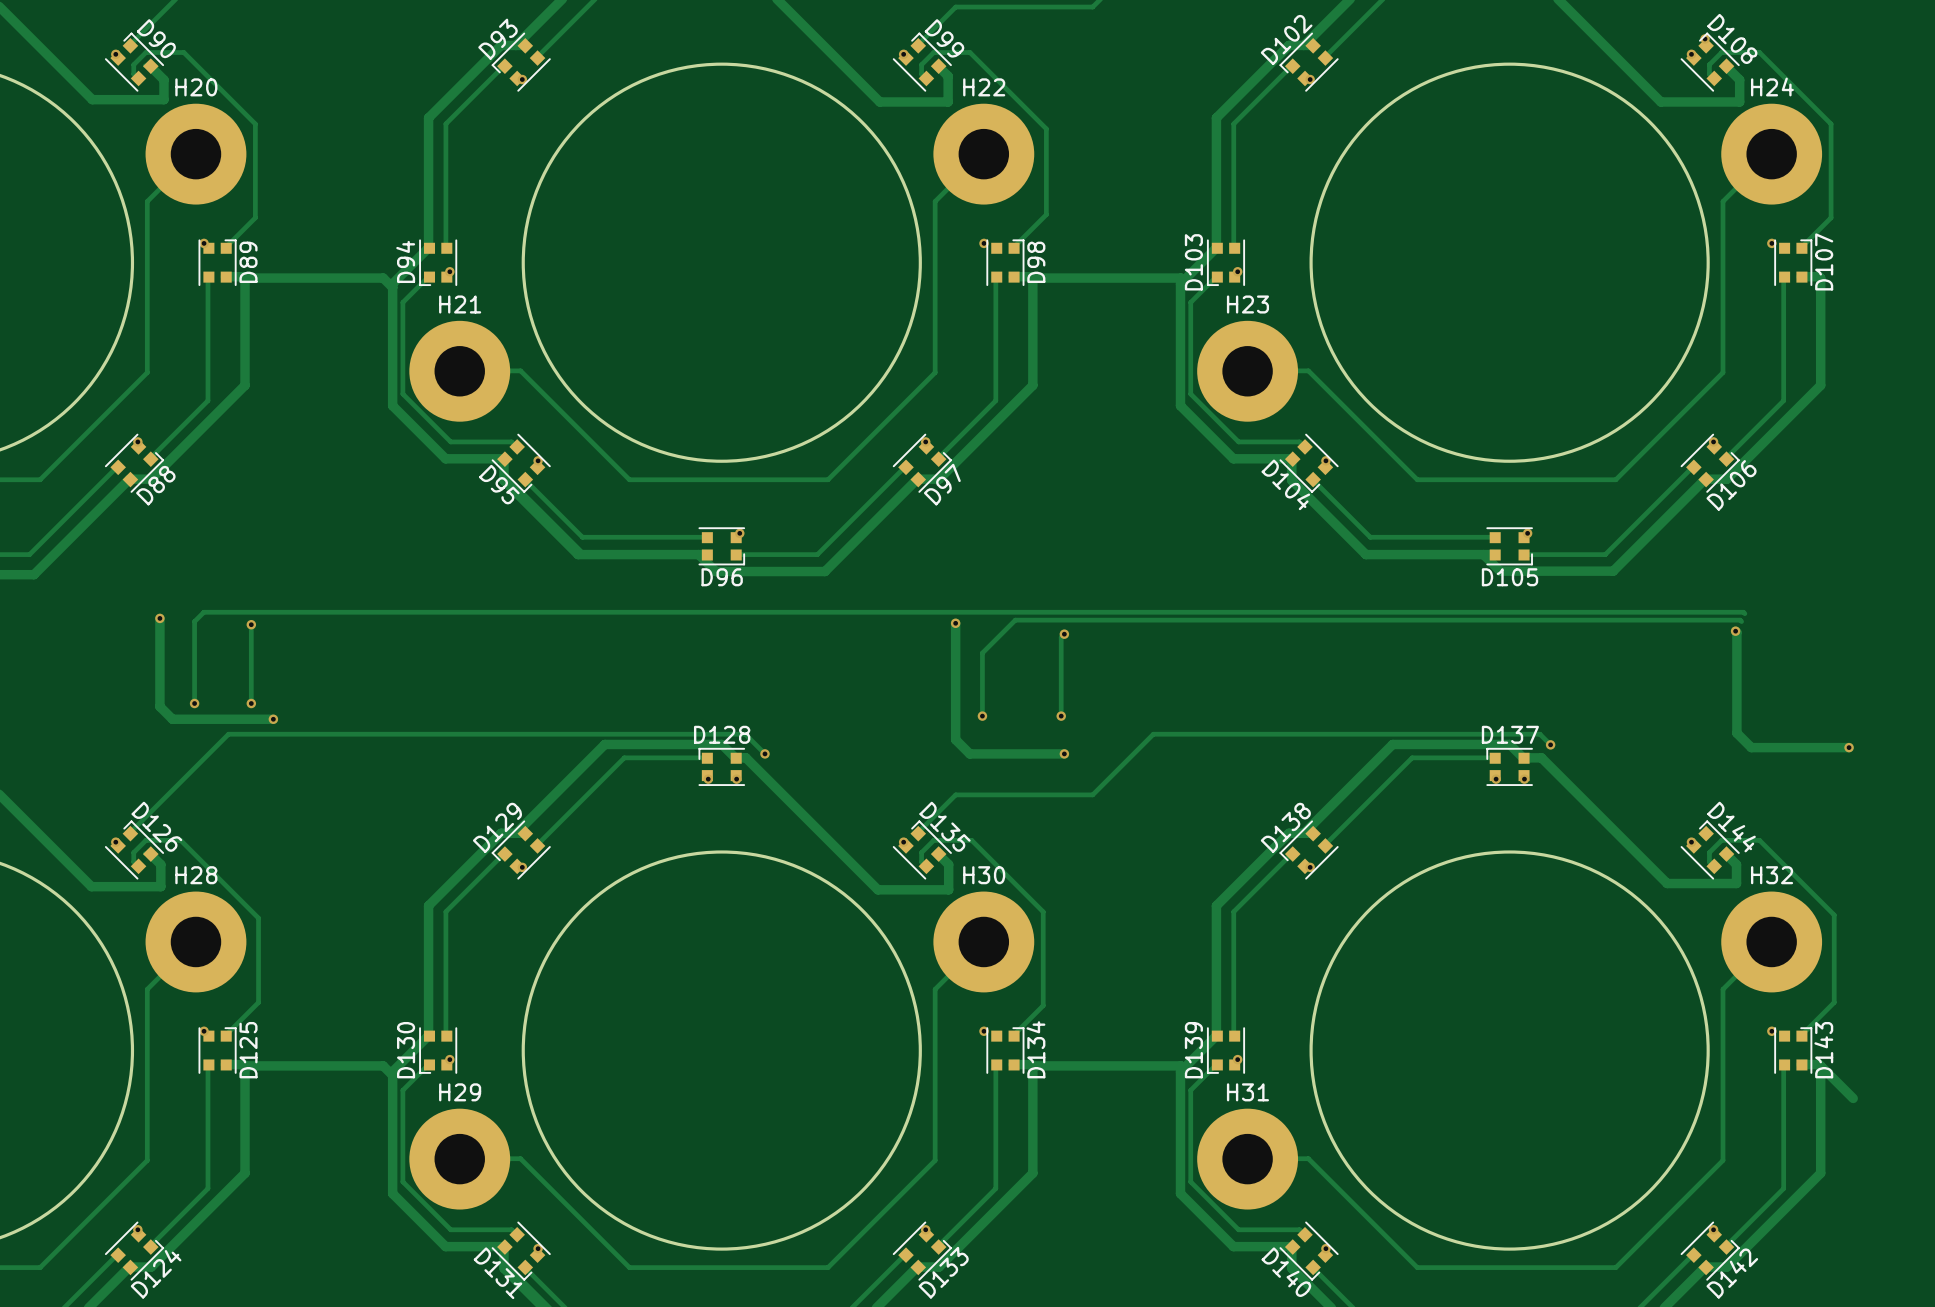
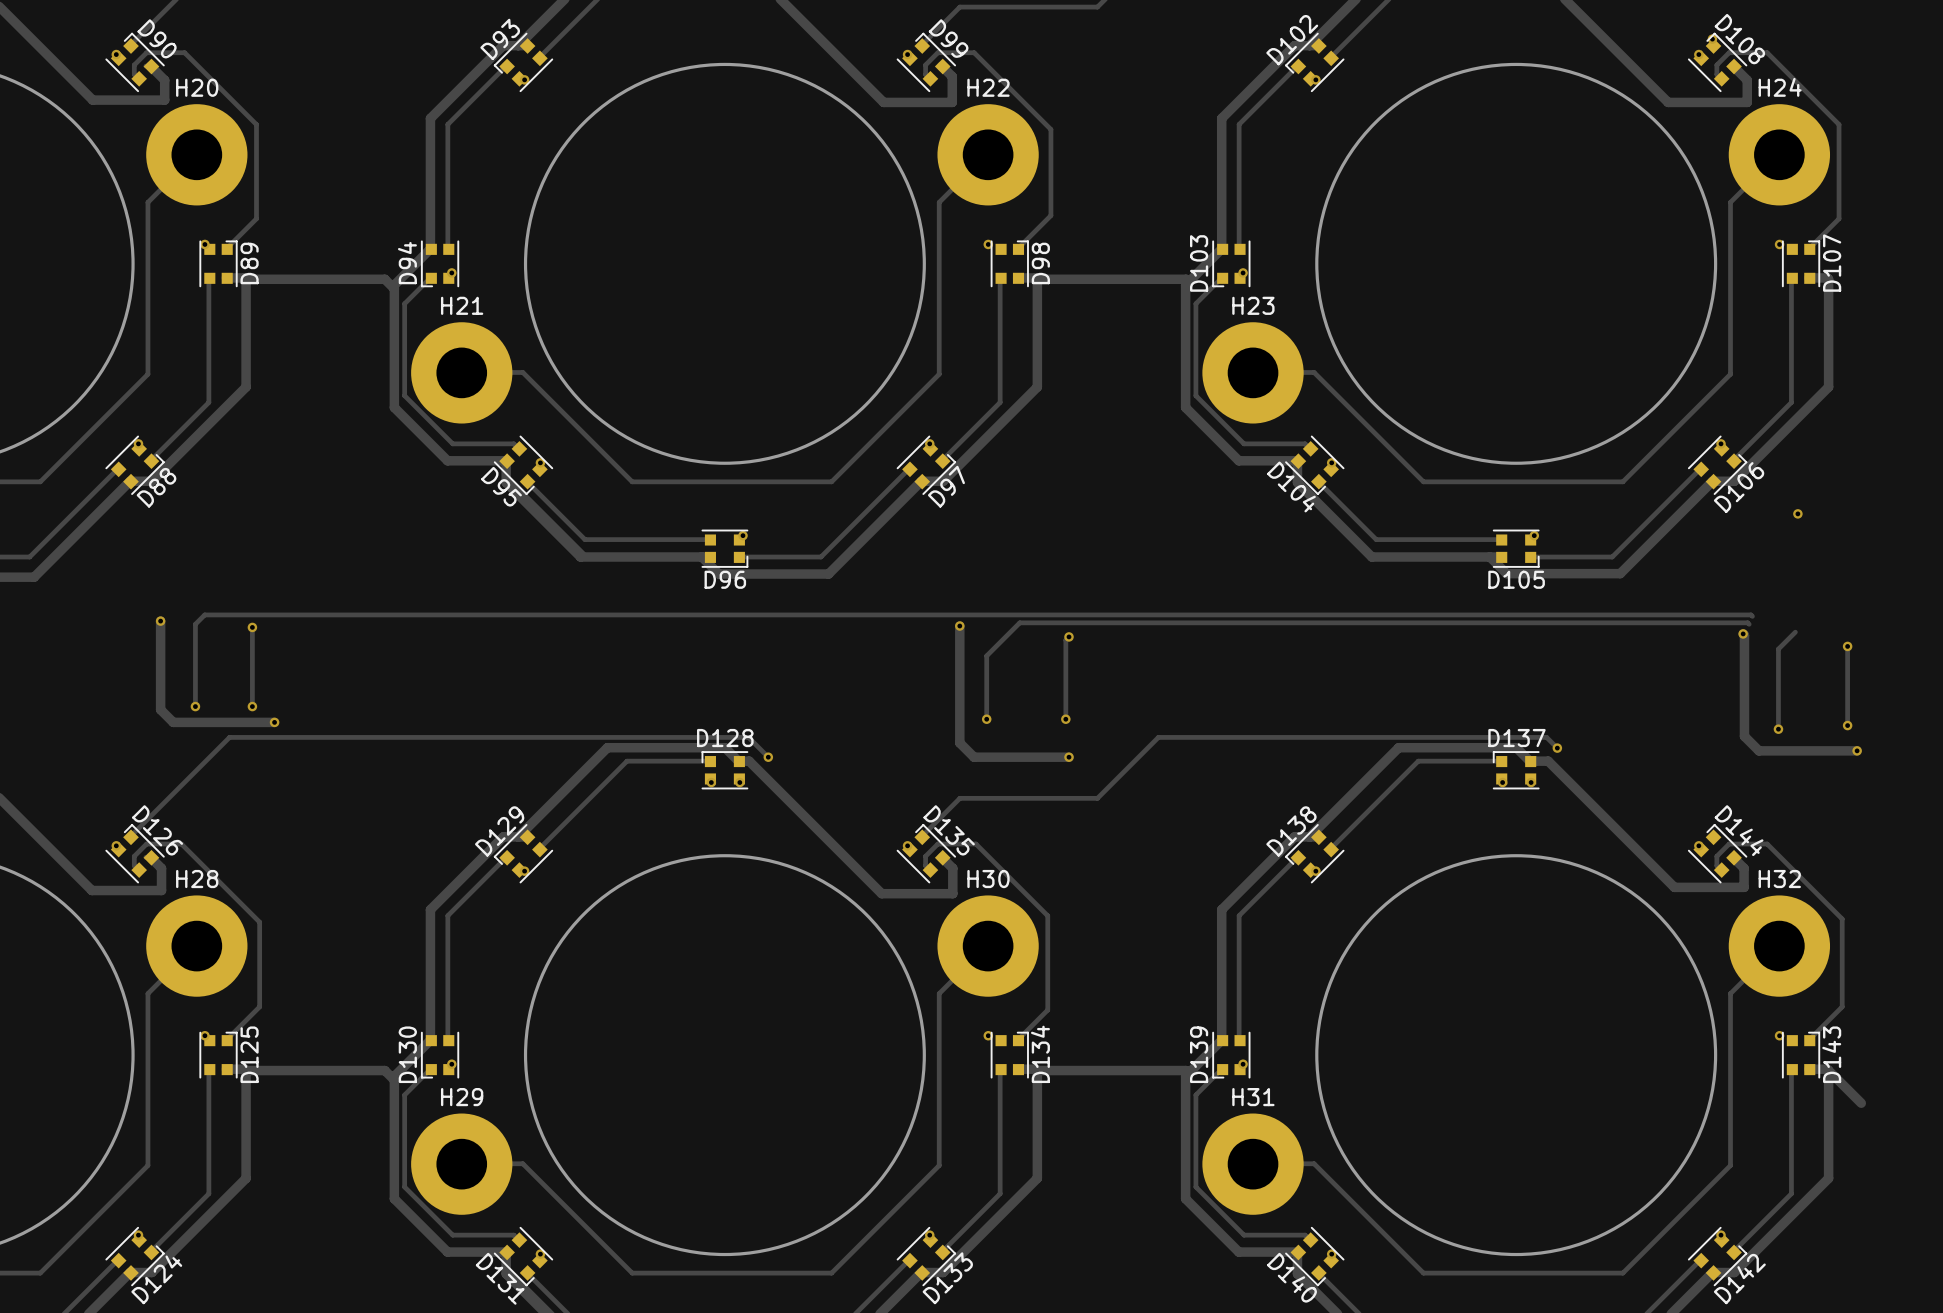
via: none -> (1797, 513)
track: none -> (1795, 632) (1778, 649) (1778, 729)
track: none -> (1847, 646) (1847, 725)
via: none -> (1847, 646)
via: none -> (1847, 725)
via: none -> (1778, 729)

